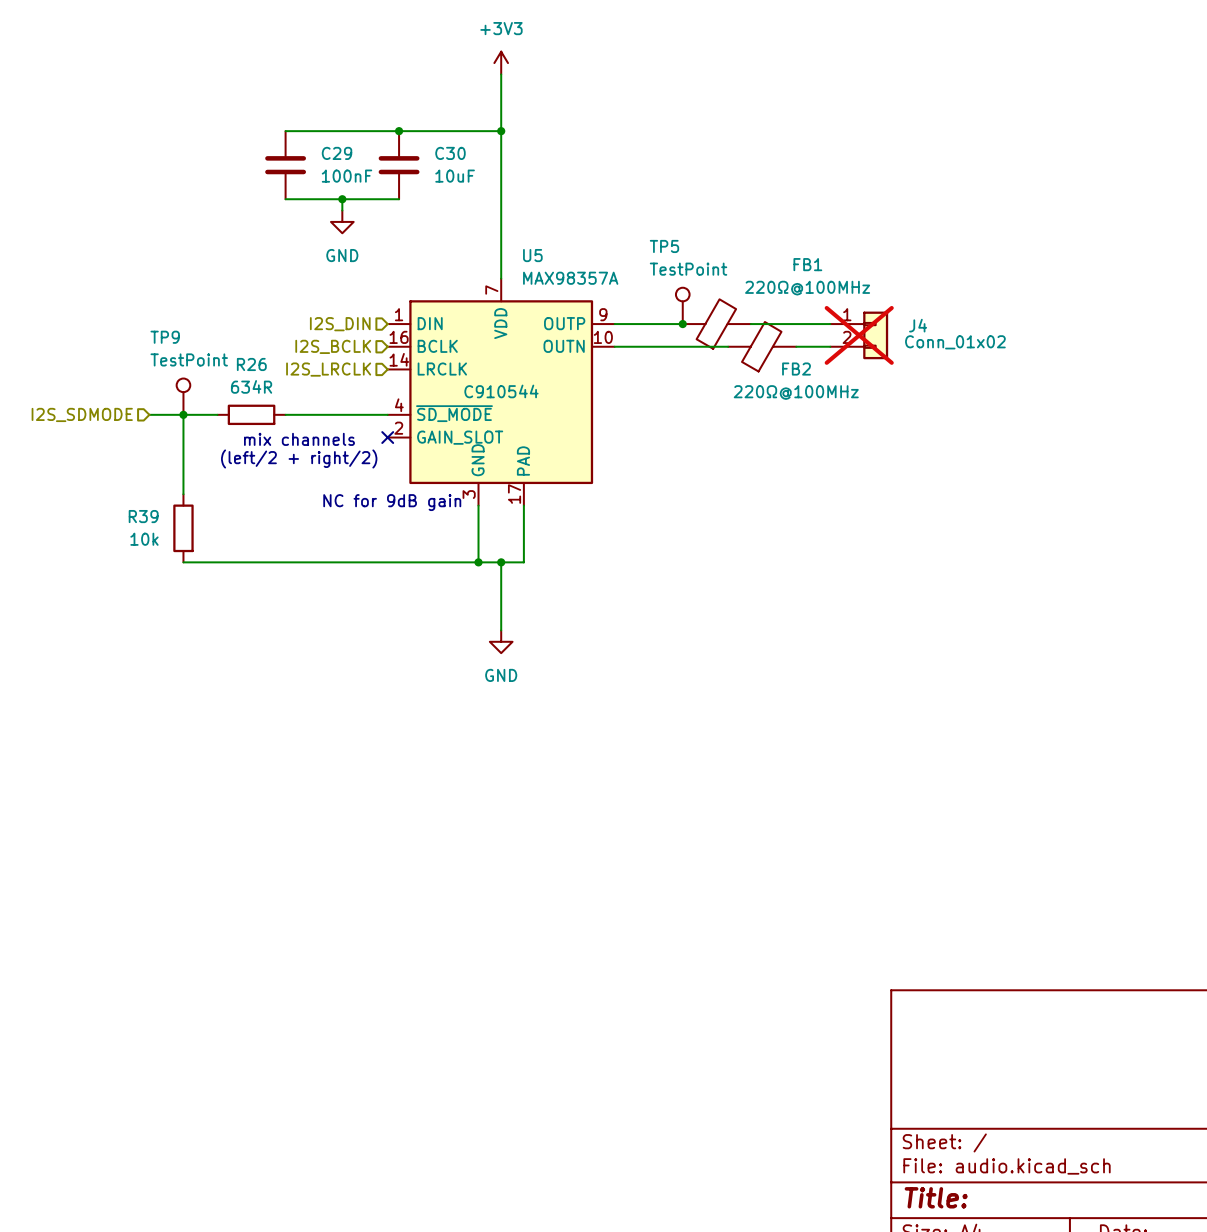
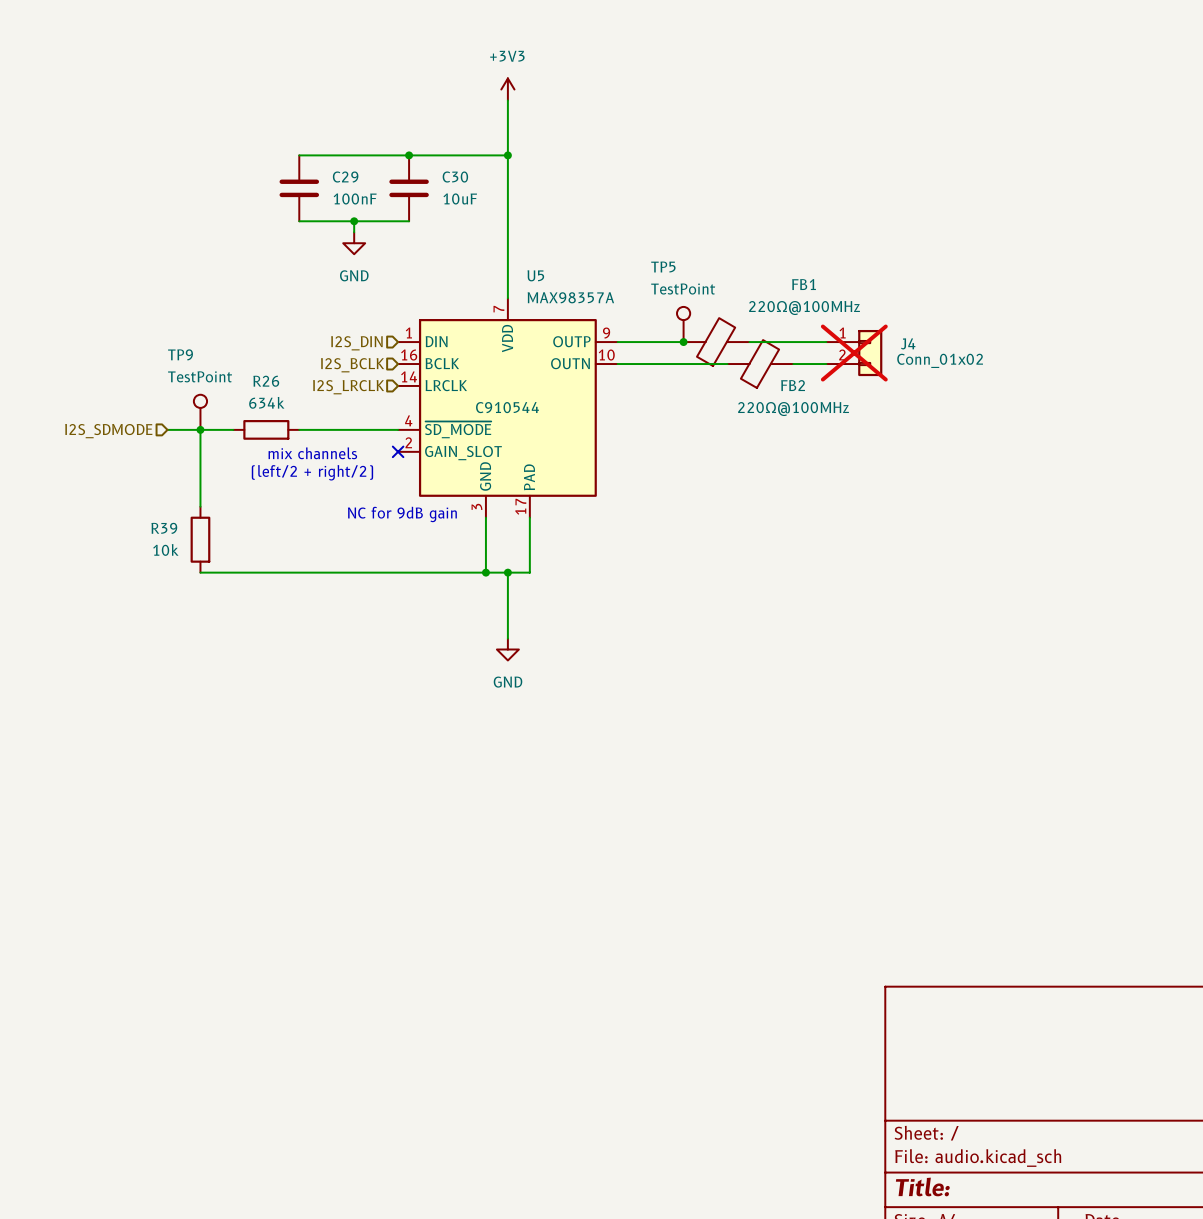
R26 value: 634R (251, 386) -> 634k (266, 402)

